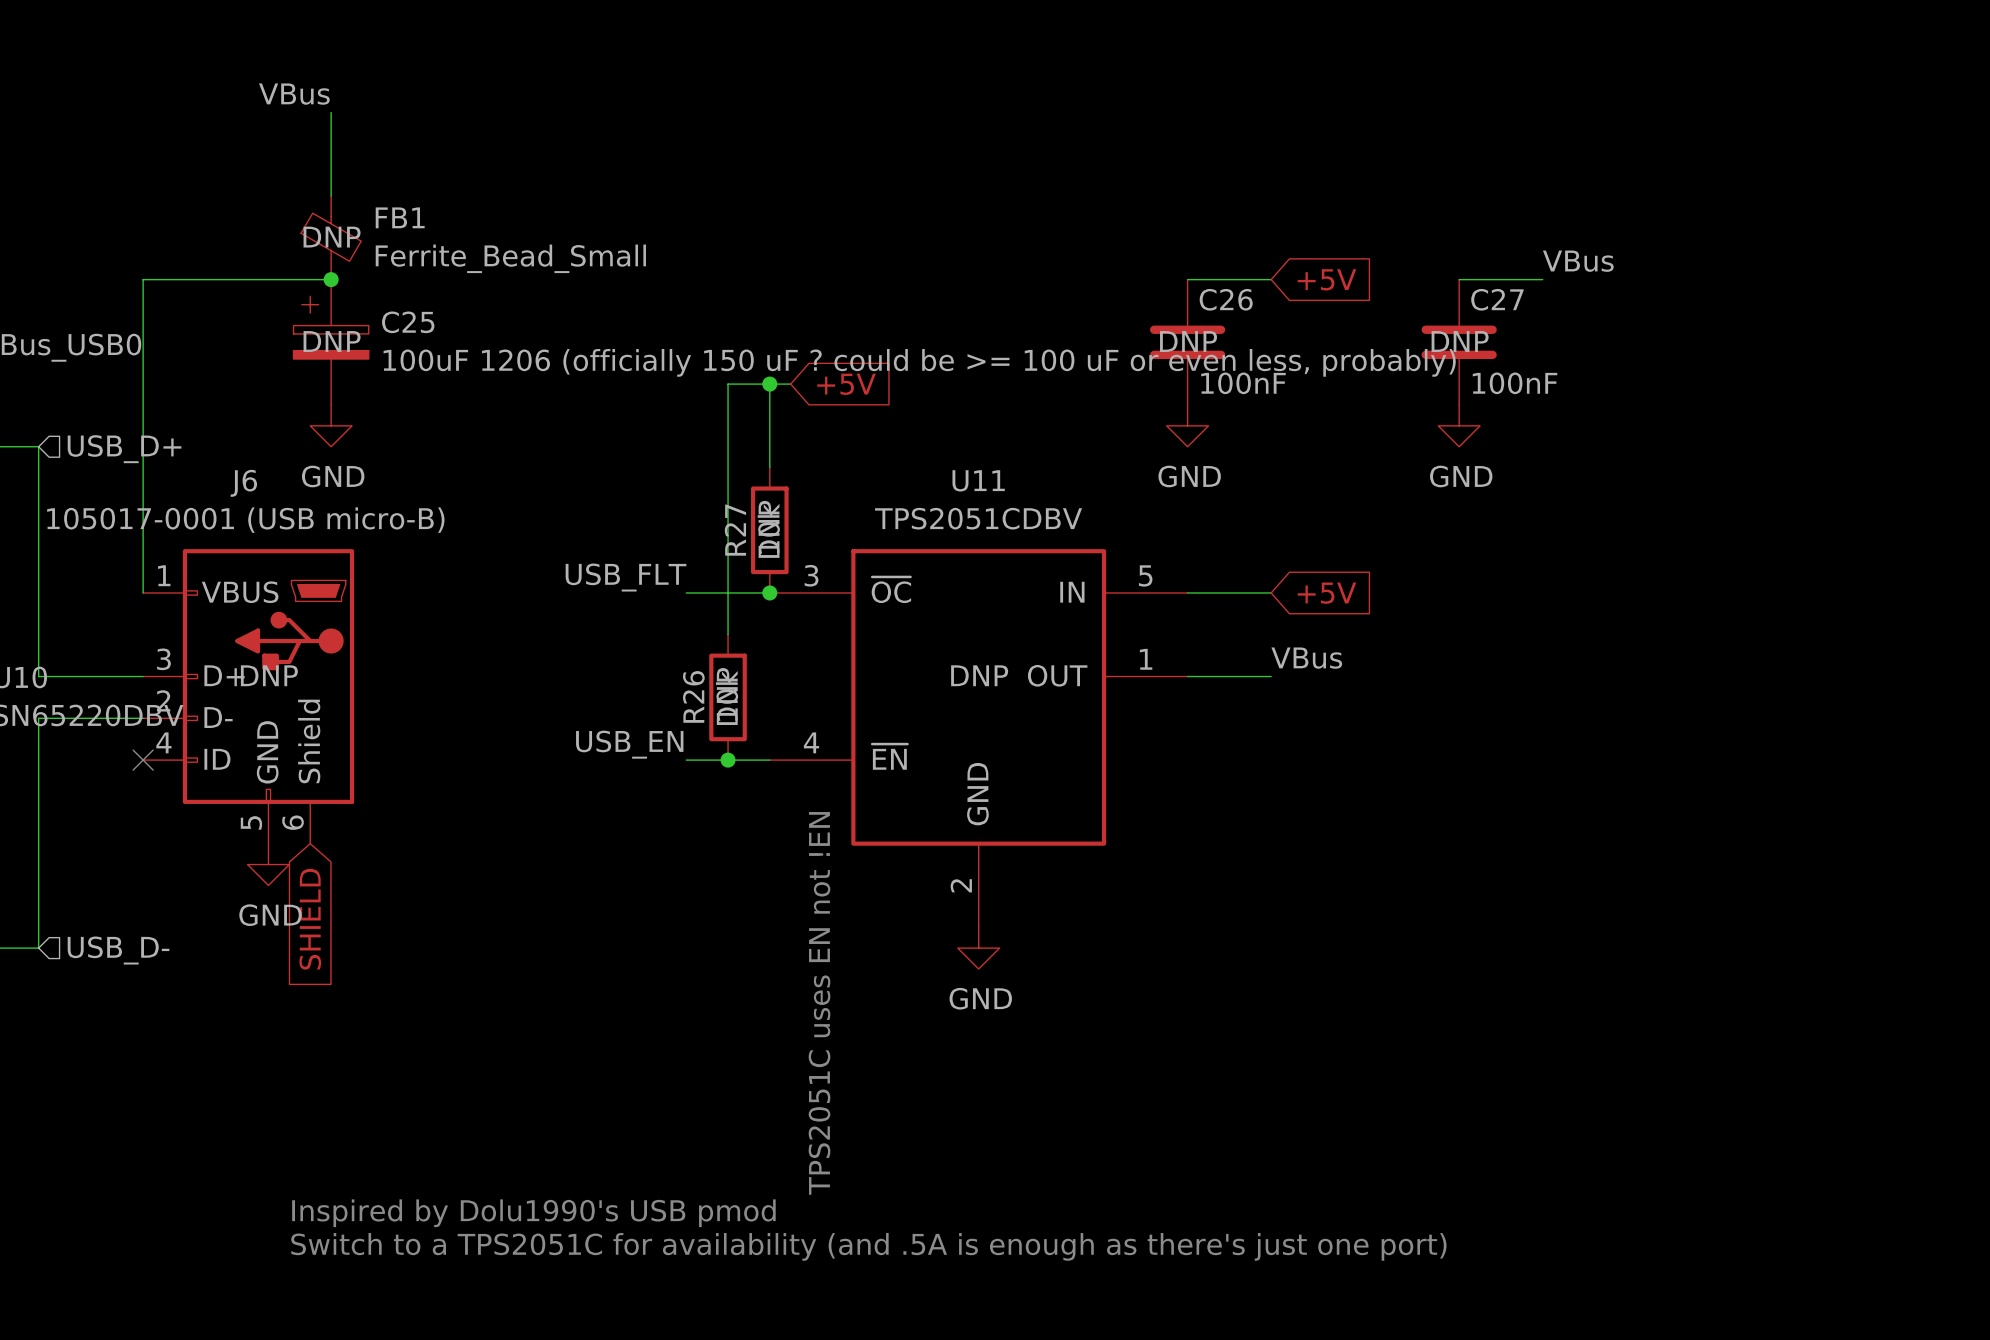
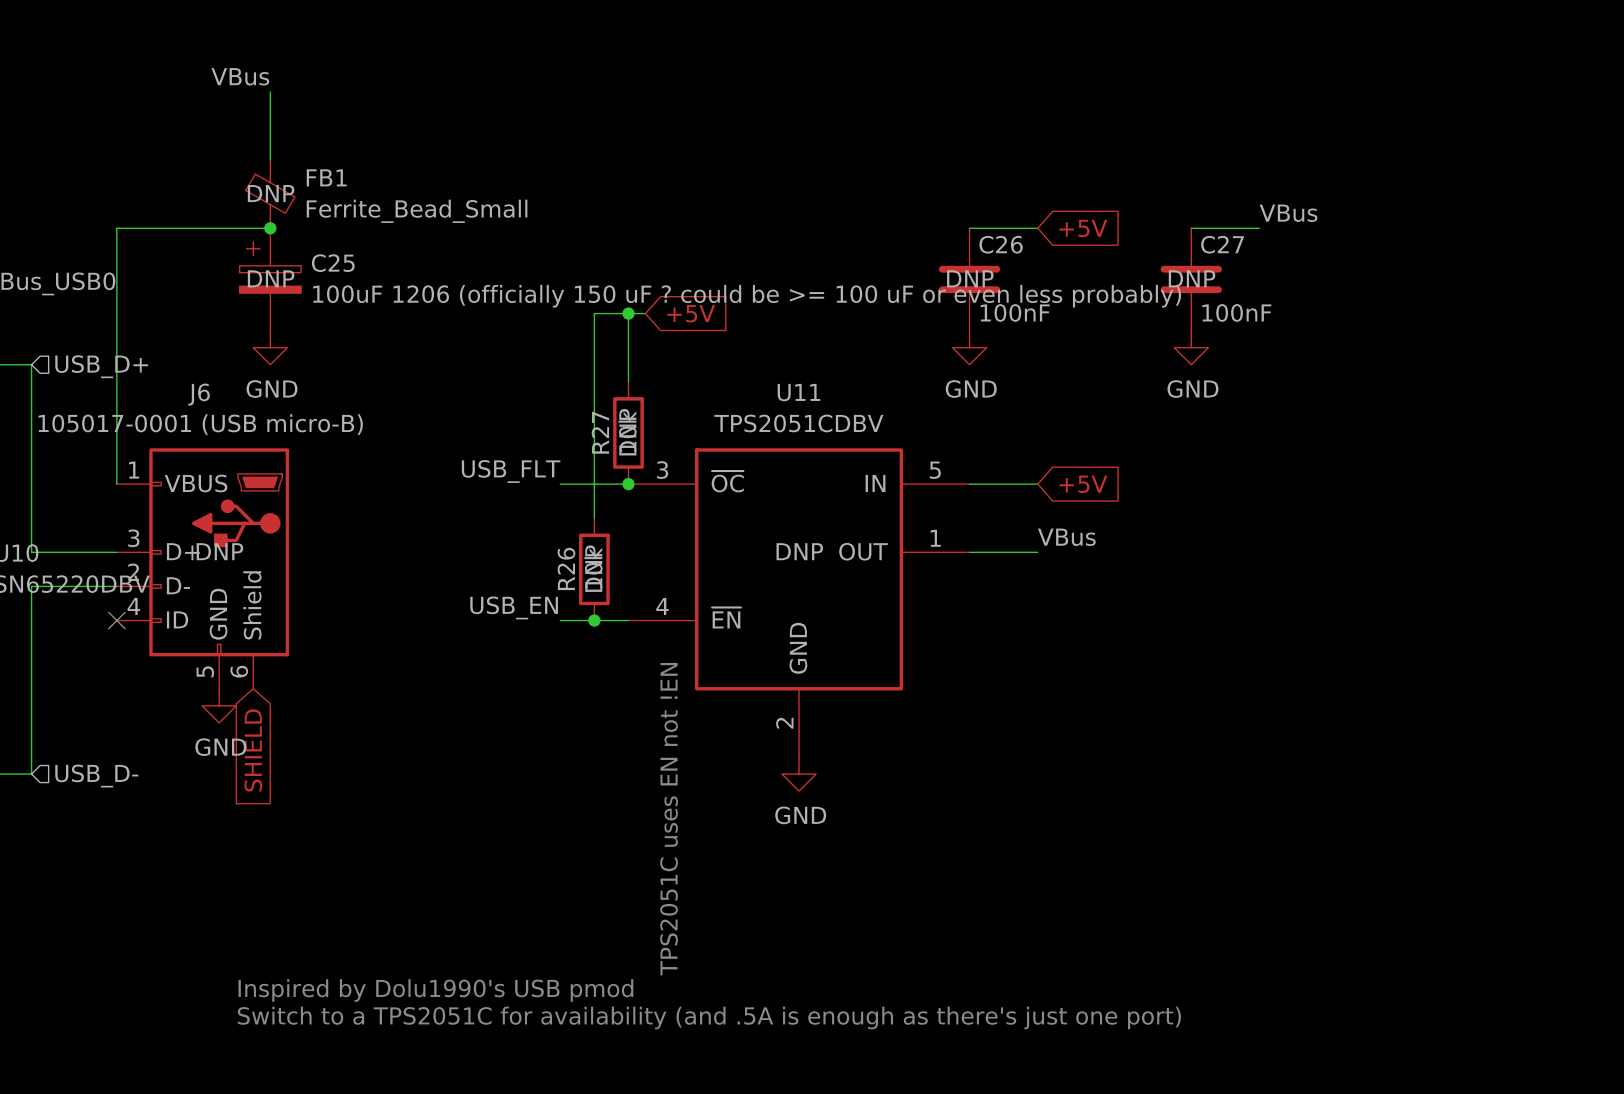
C25 value: 100uF 1206 (officially 150 uF ? could be >= 100 uF or even less, probably) (919, 362) -> 100uF 1206 (officially 150 uF ? could be >= 100 uF or even less probably) (747, 296)

